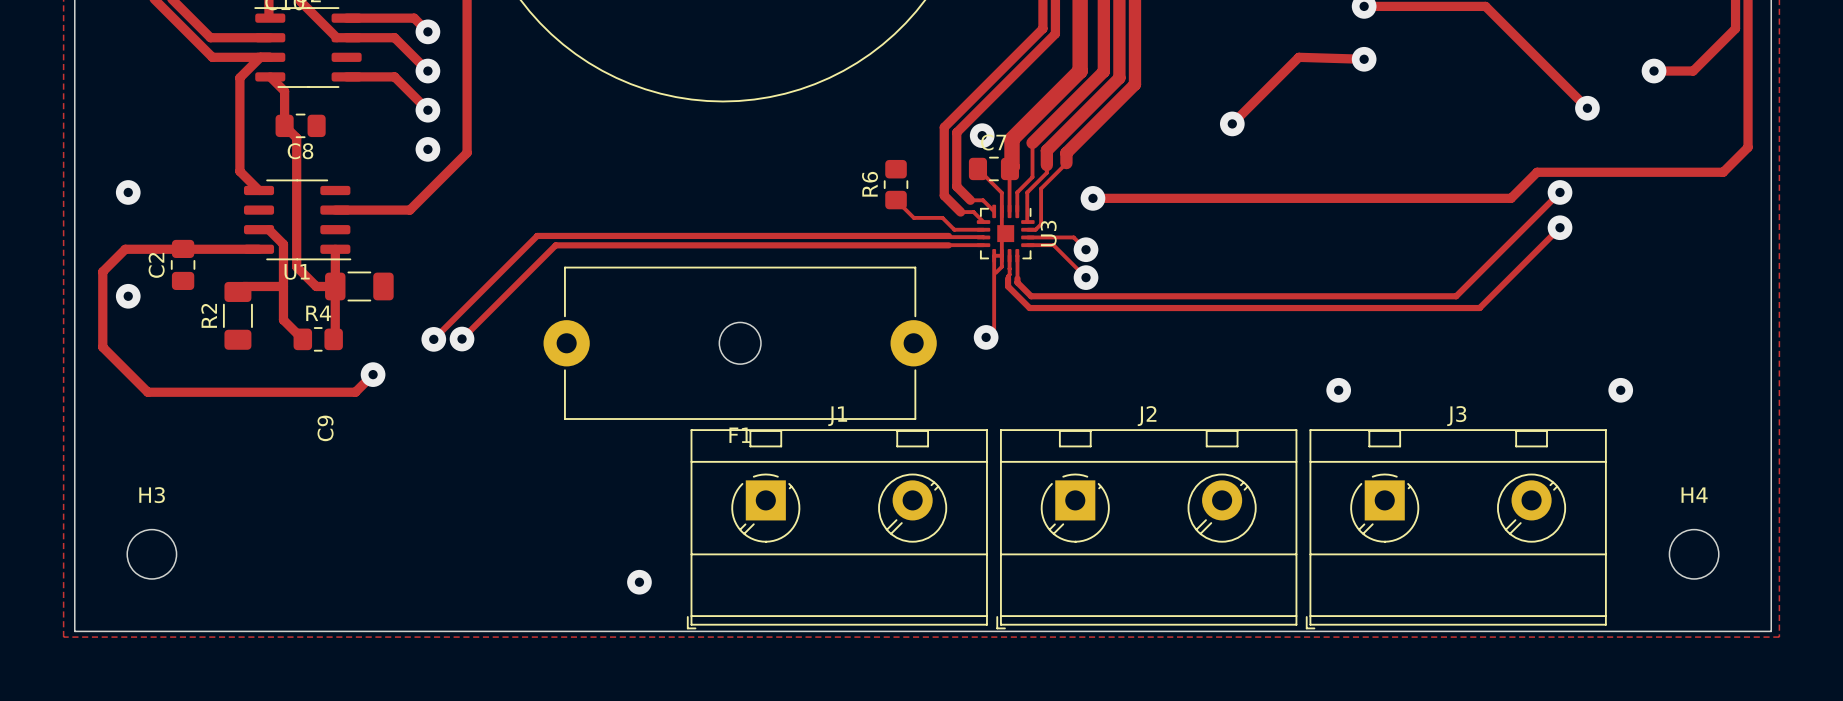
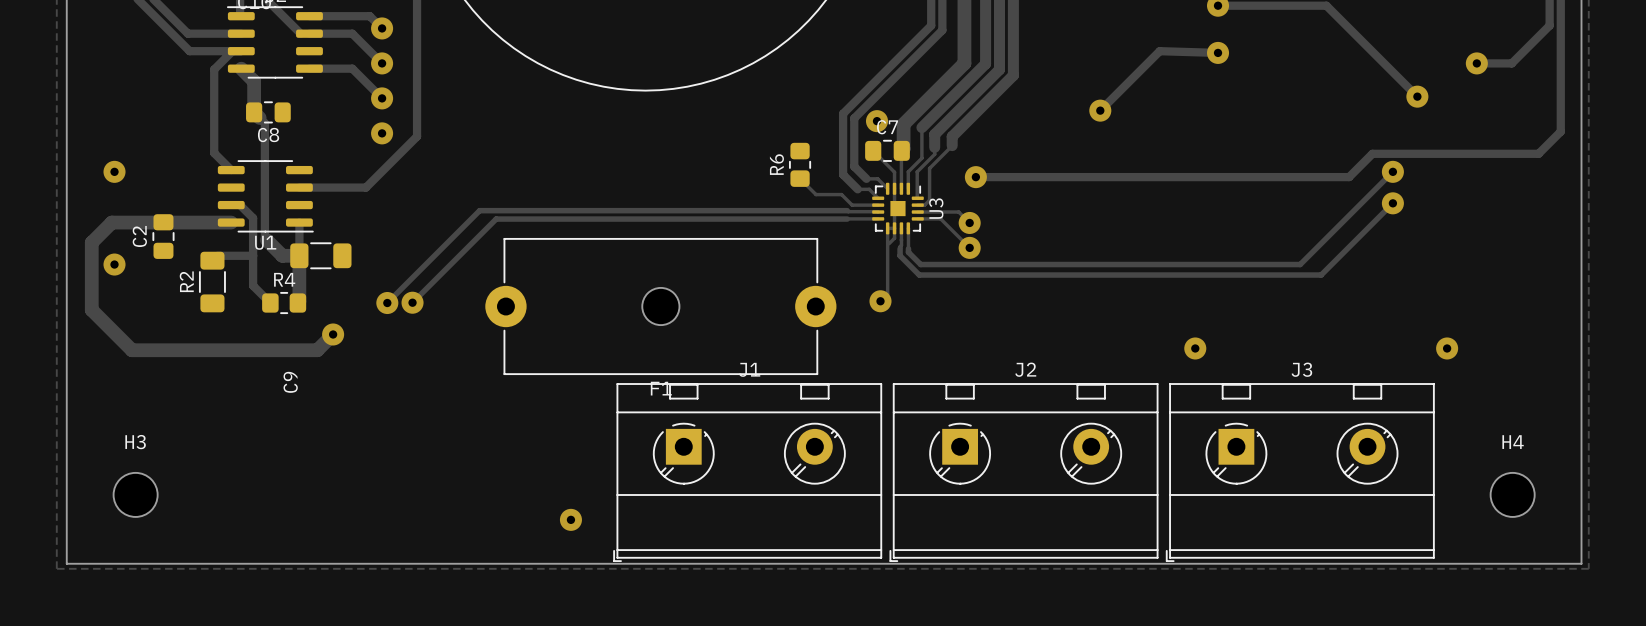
track width: thin (270, 76) (284, 91) (284, 125) (290, 132) -> thick (241, 68) (254, 81) (254, 112) (259, 117)
track width: thin (259, 249) (125, 249) (102, 271) (102, 347) (147, 392) (355, 392) (373, 374) -> thick (231, 222) (111, 222) (91, 242) (91, 310) (132, 350) (317, 350) (333, 334)
track width: thin (299, 269) (316, 286) (335, 286) (335, 337) (333, 339) -> thick (267, 240) (282, 255) (299, 255) (297, 303)

